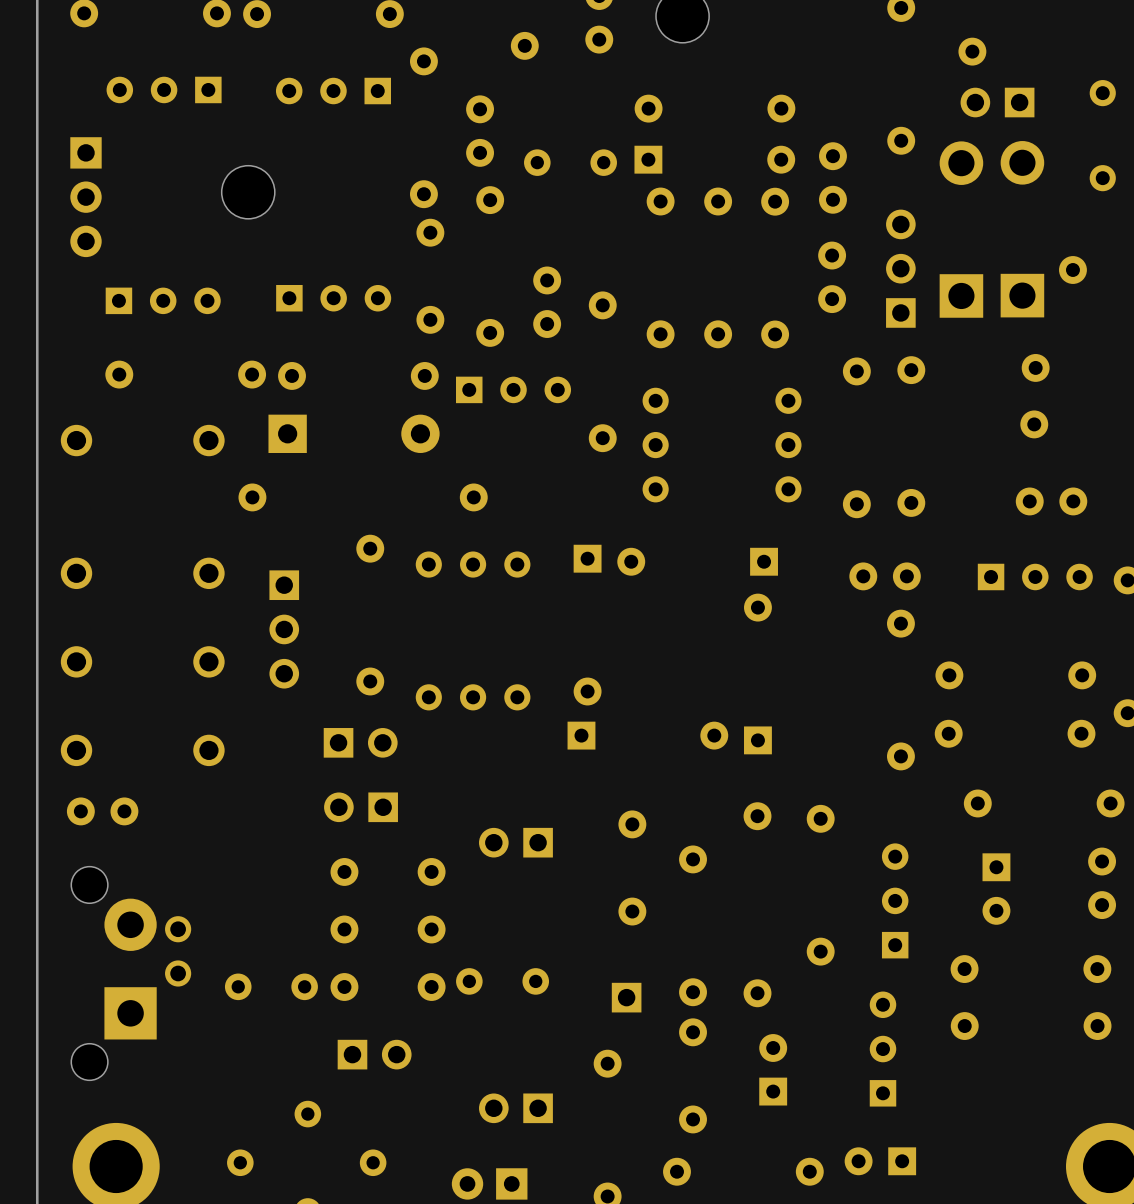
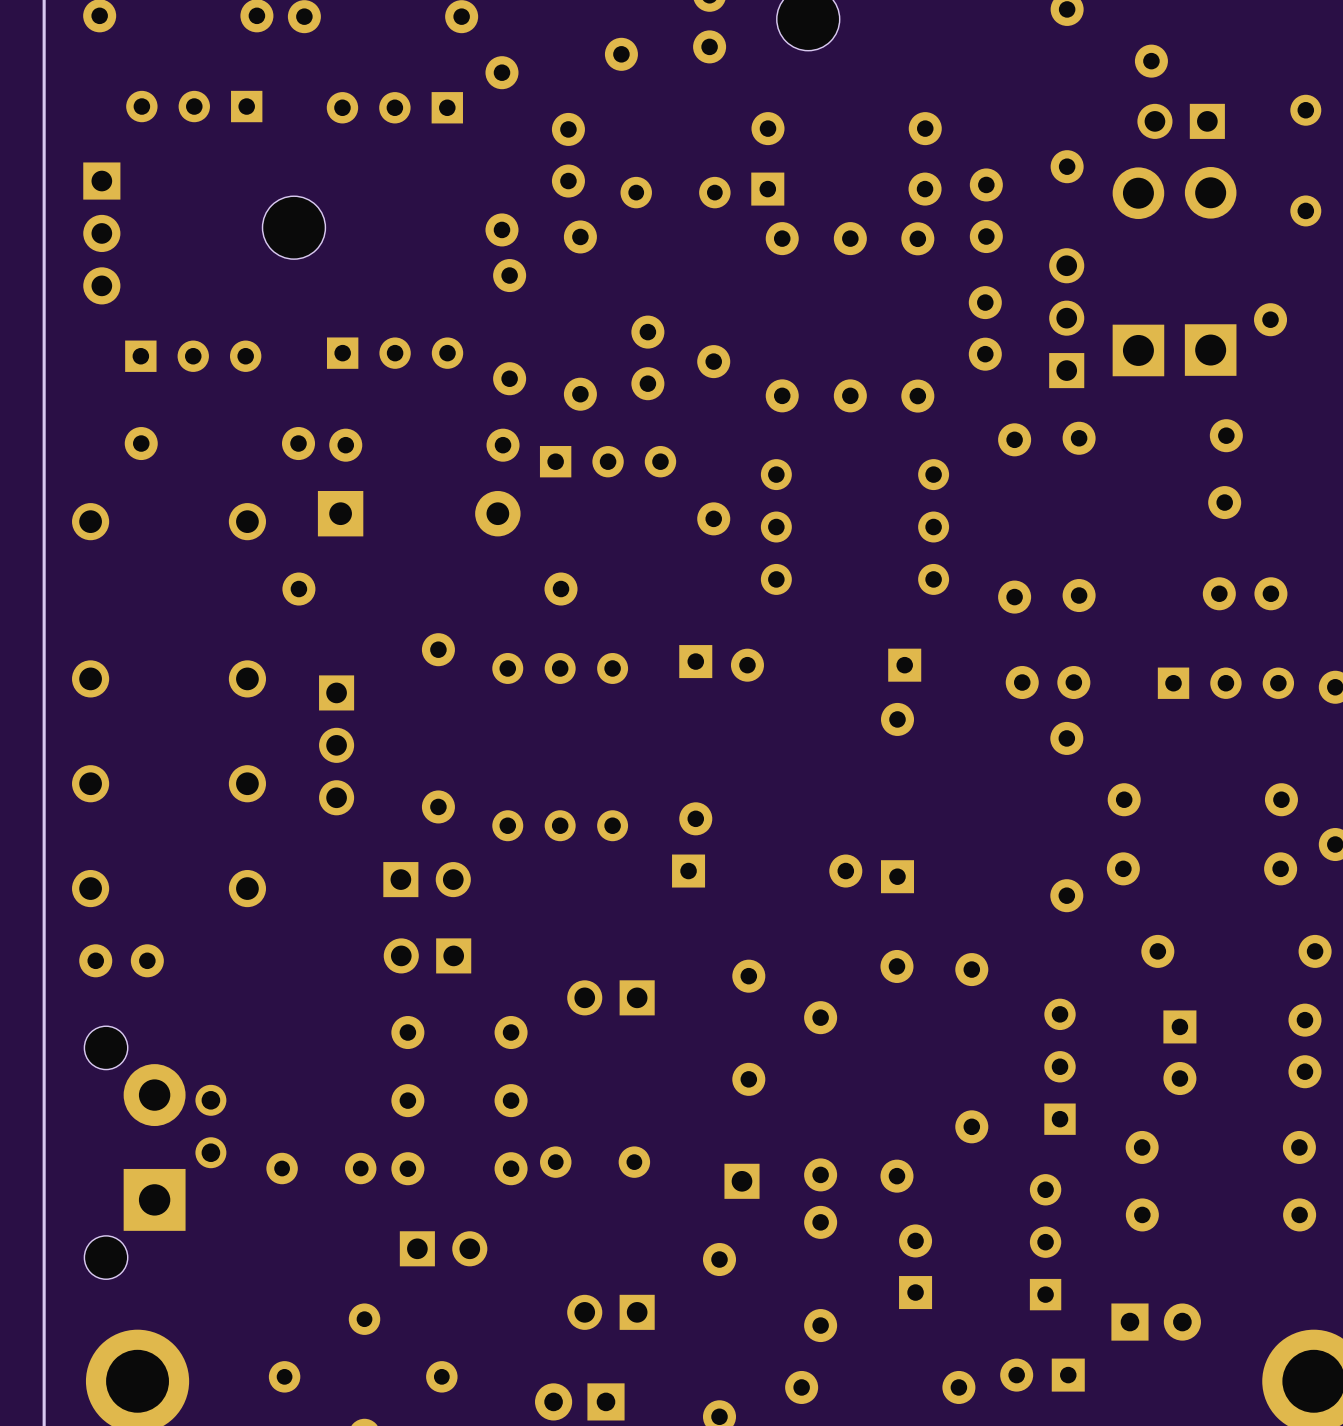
part: none -> (1156, 1322)

